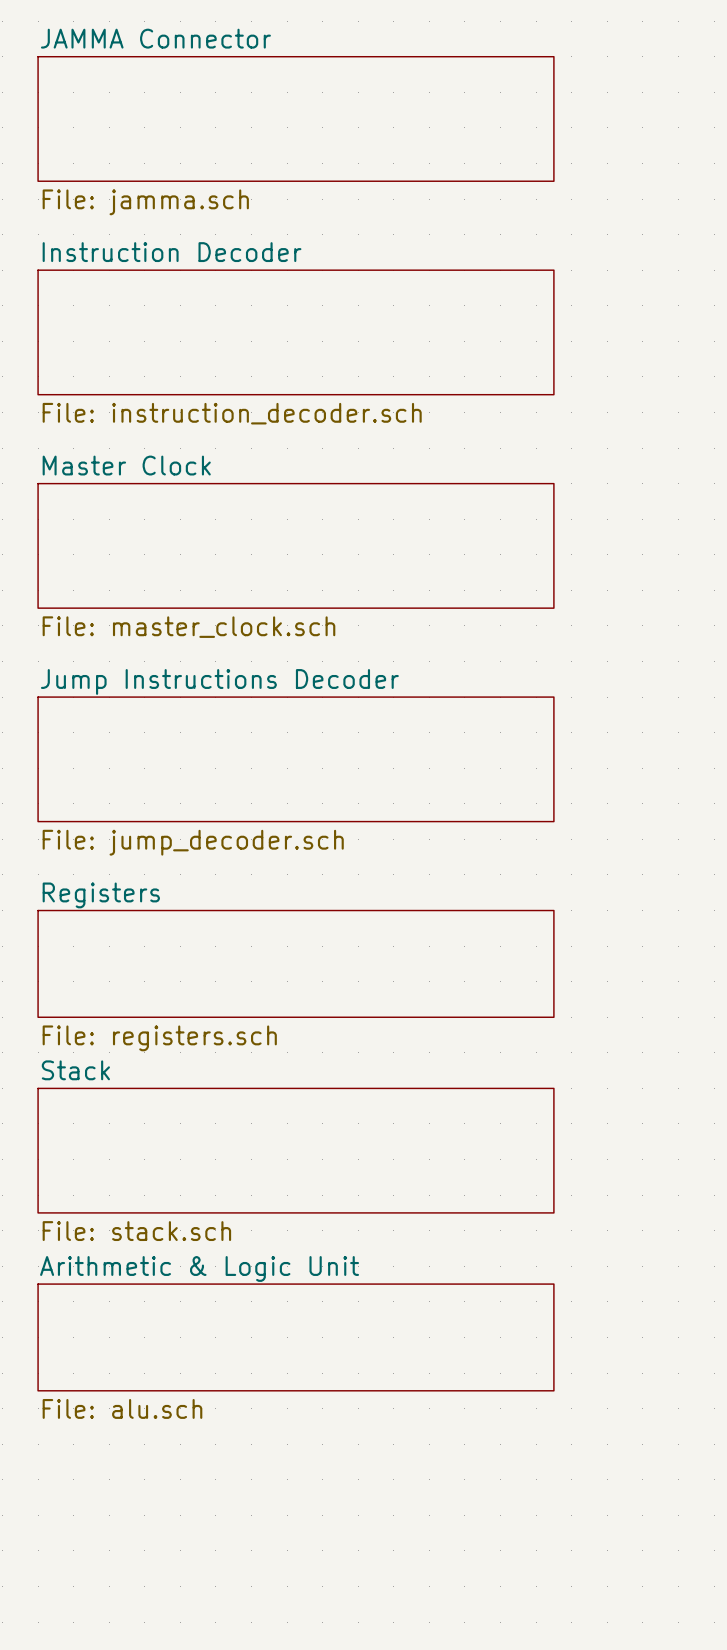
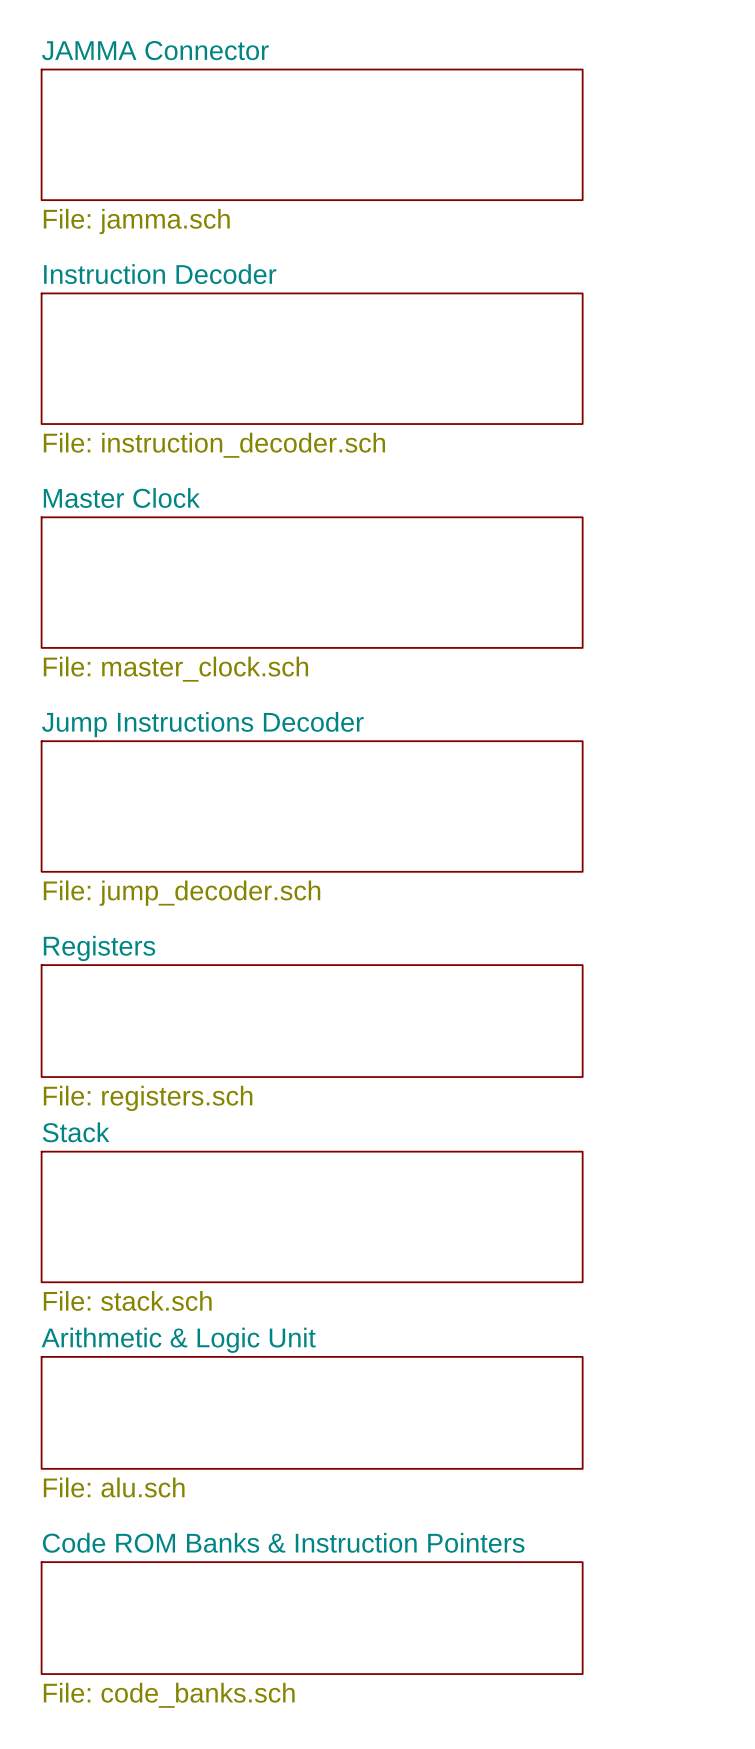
sheet Code ROM Banks & Instruction Pointers: none -> File: code_banks.sch (312, 1618)

